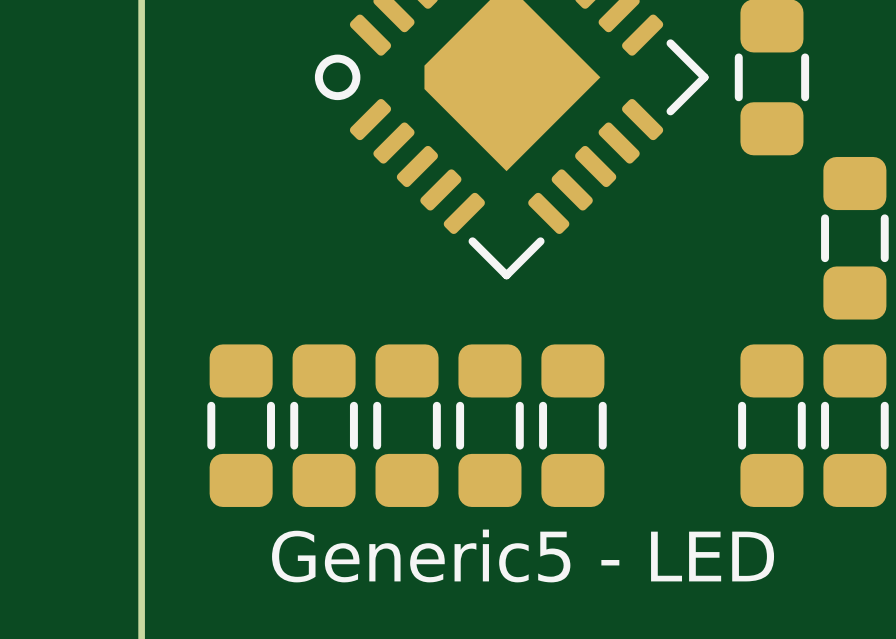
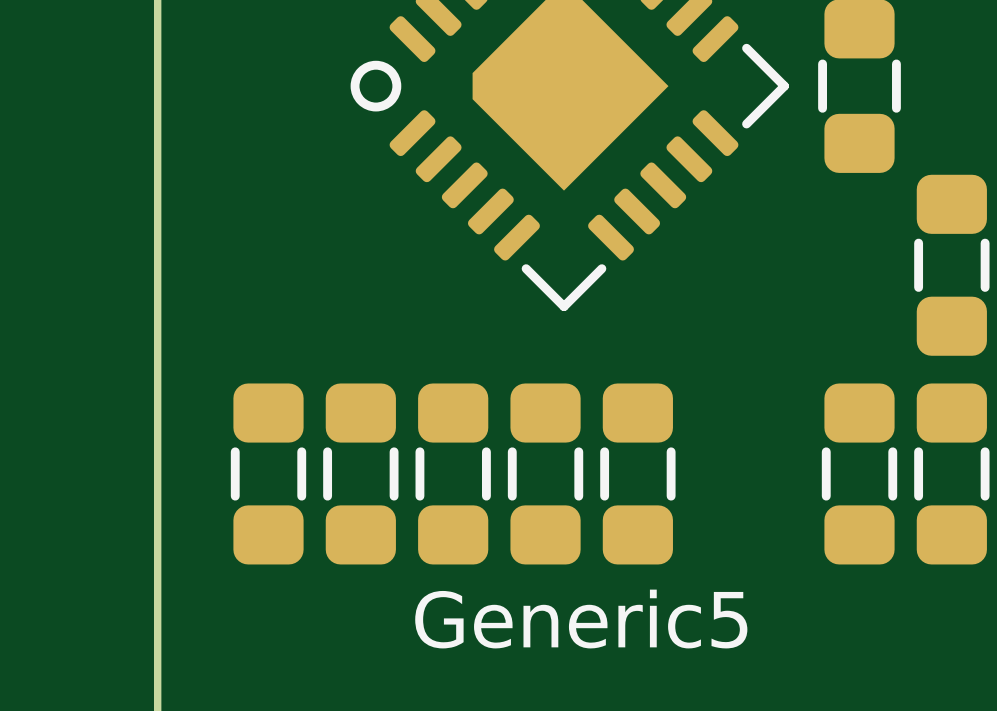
text: Generic5 - LED (523, 555) -> Generic5 (581, 619)

